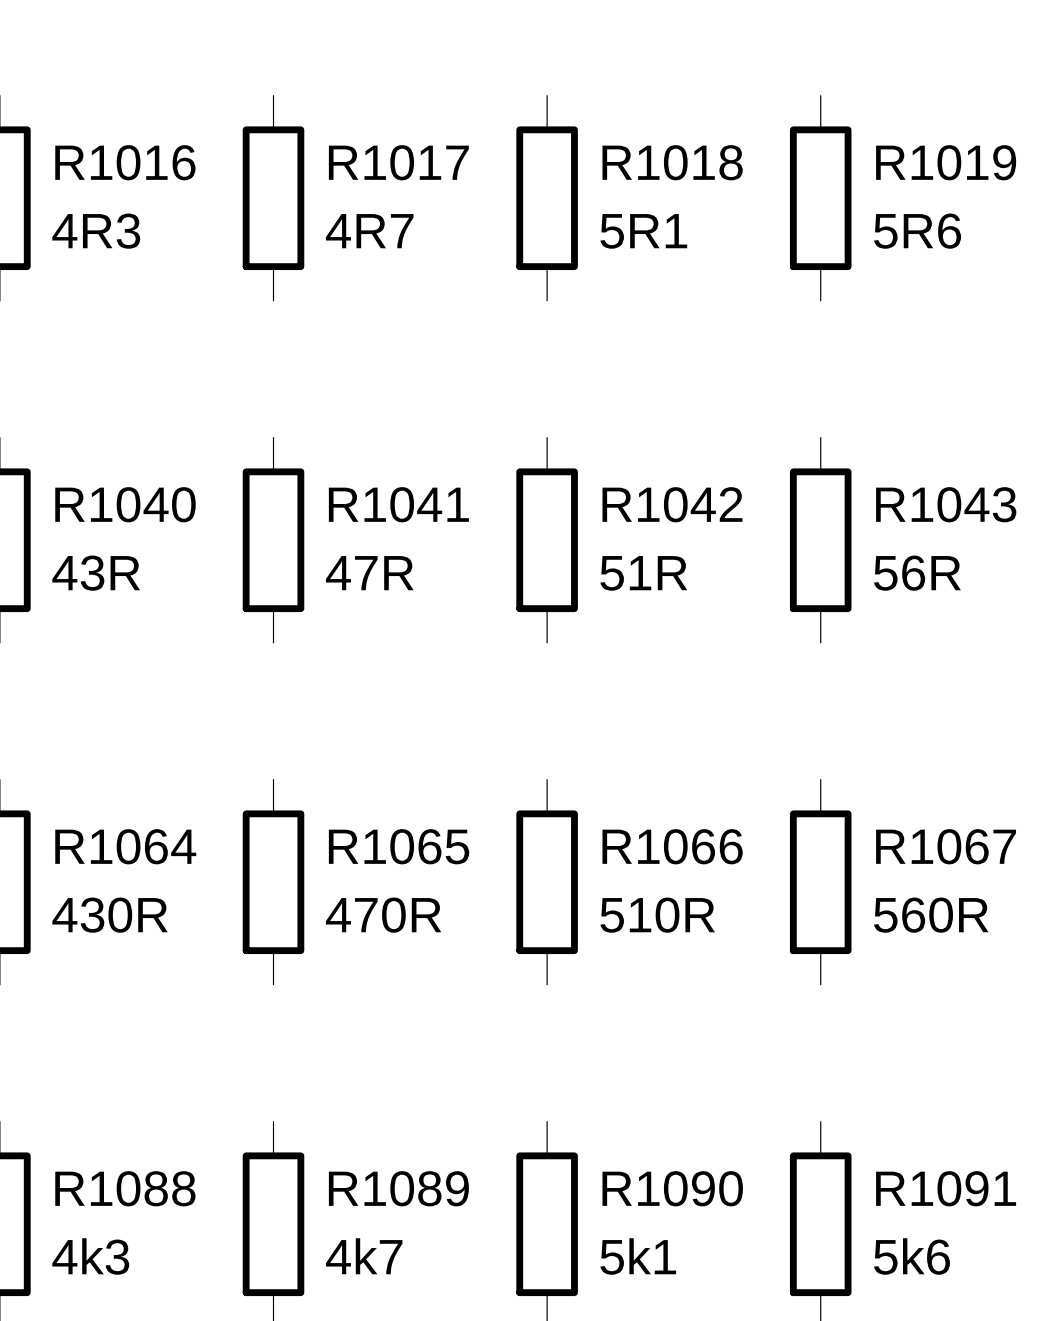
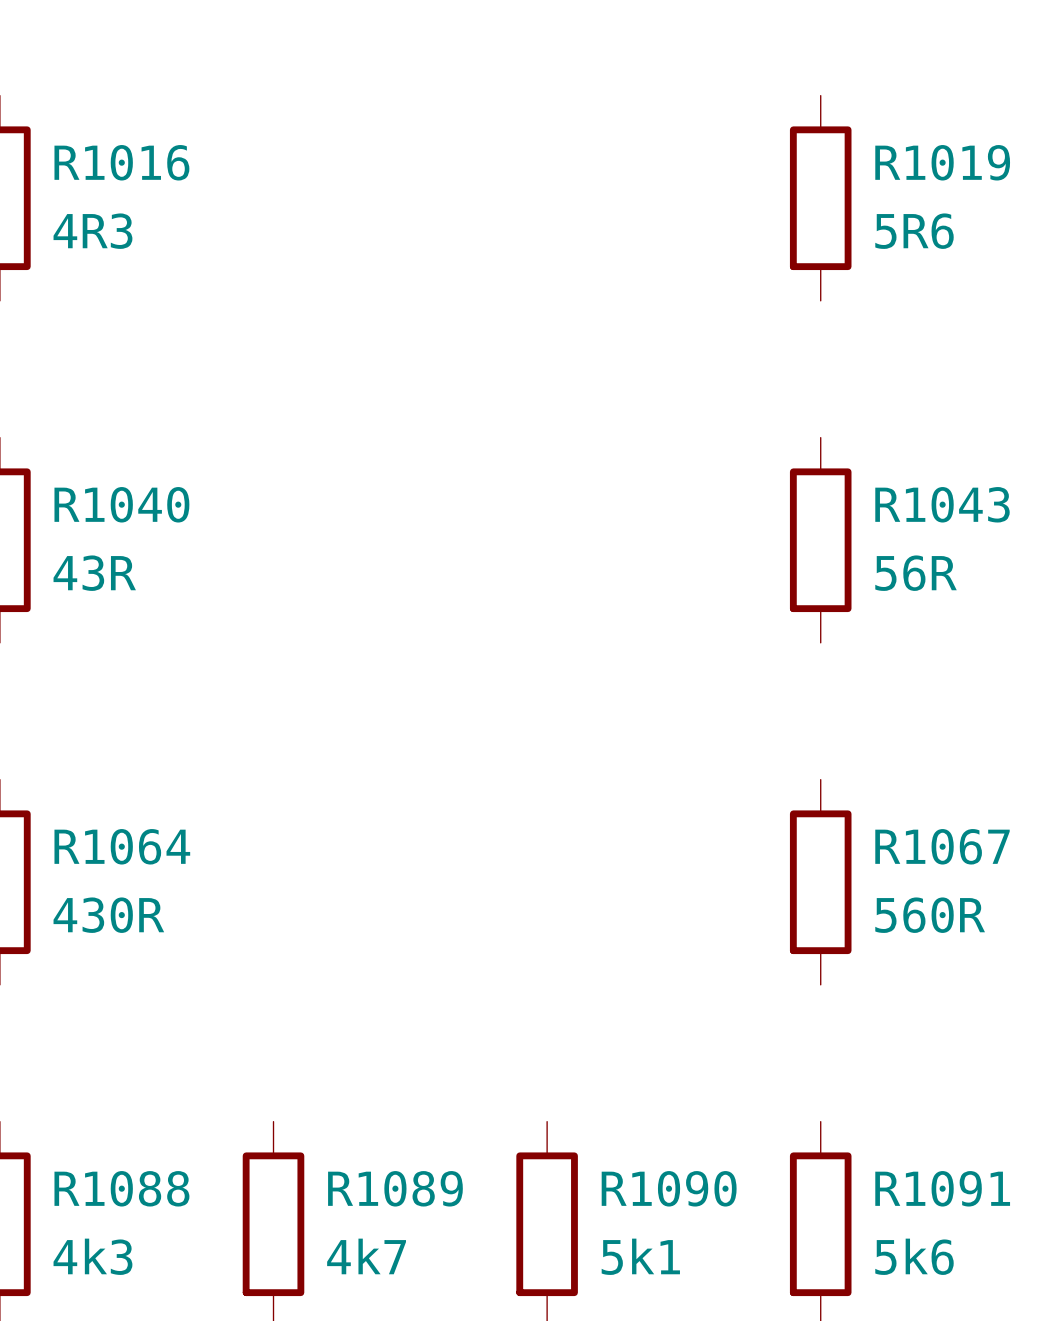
R1017: 4R7 (273, 198) -> none
R1018: 5R1 (547, 198) -> none
R1041: 47R (273, 540) -> none
R1042: 51R (547, 540) -> none
R1065: 470R (273, 882) -> none
R1066: 510R (547, 882) -> none

